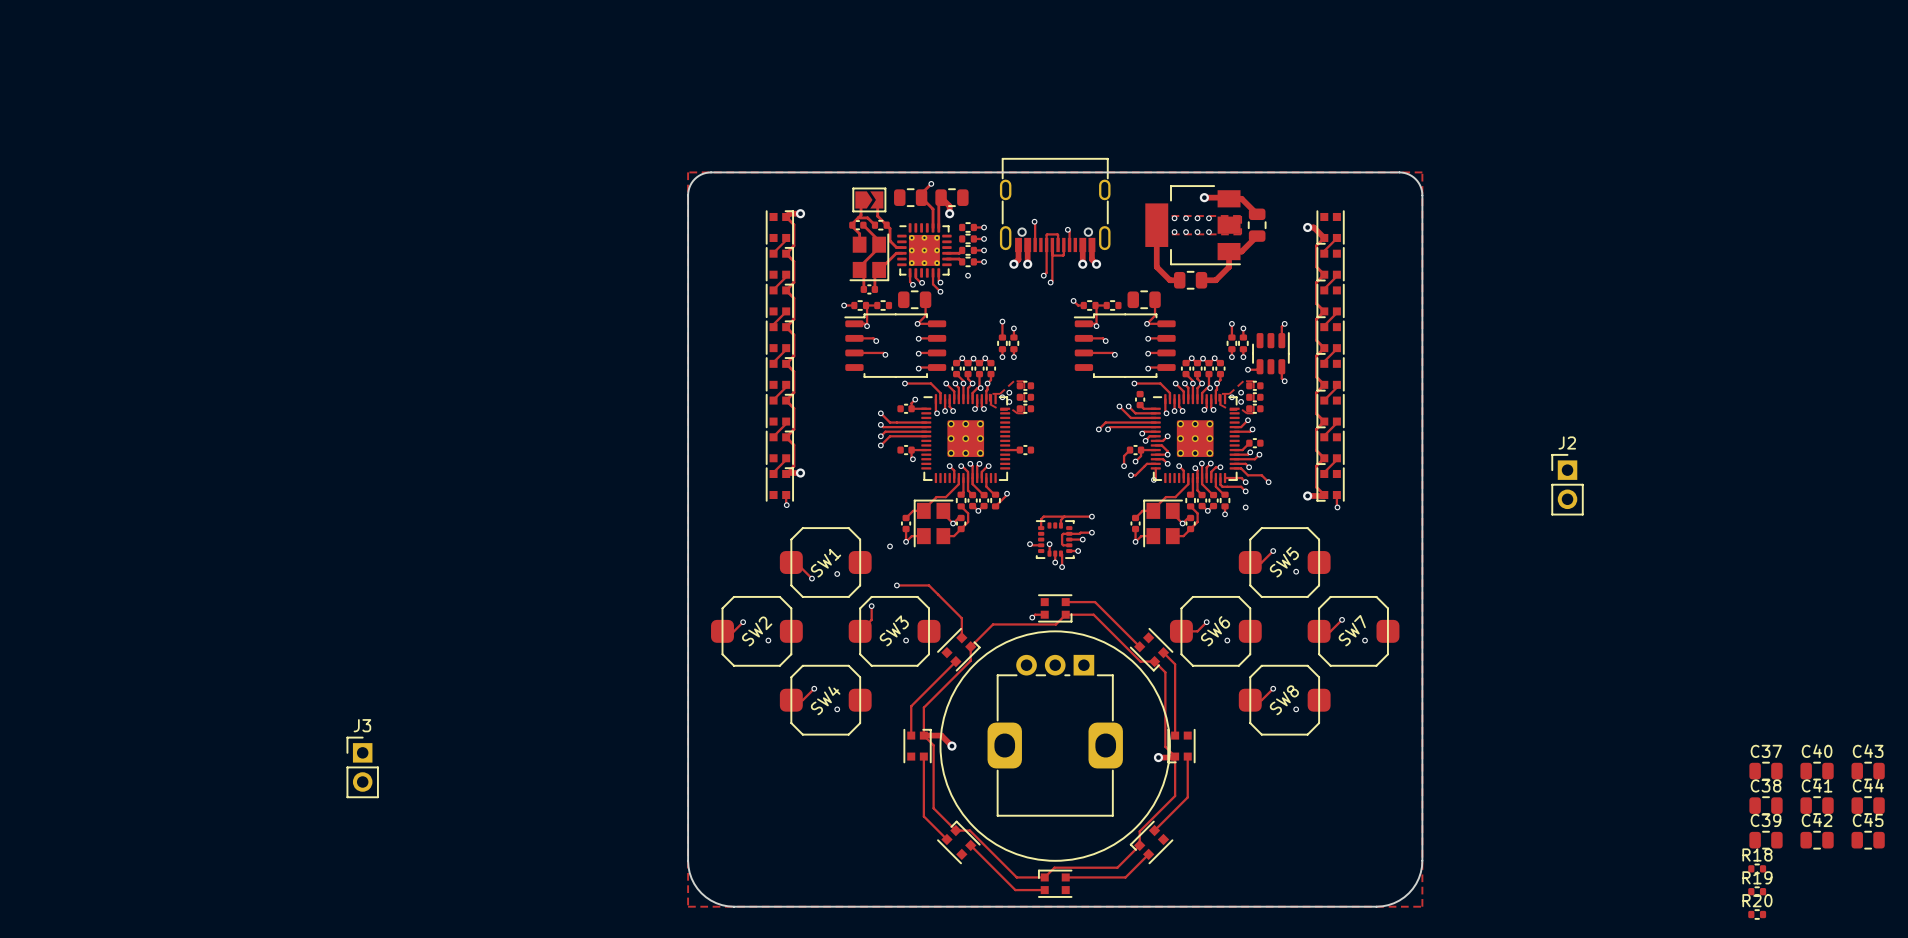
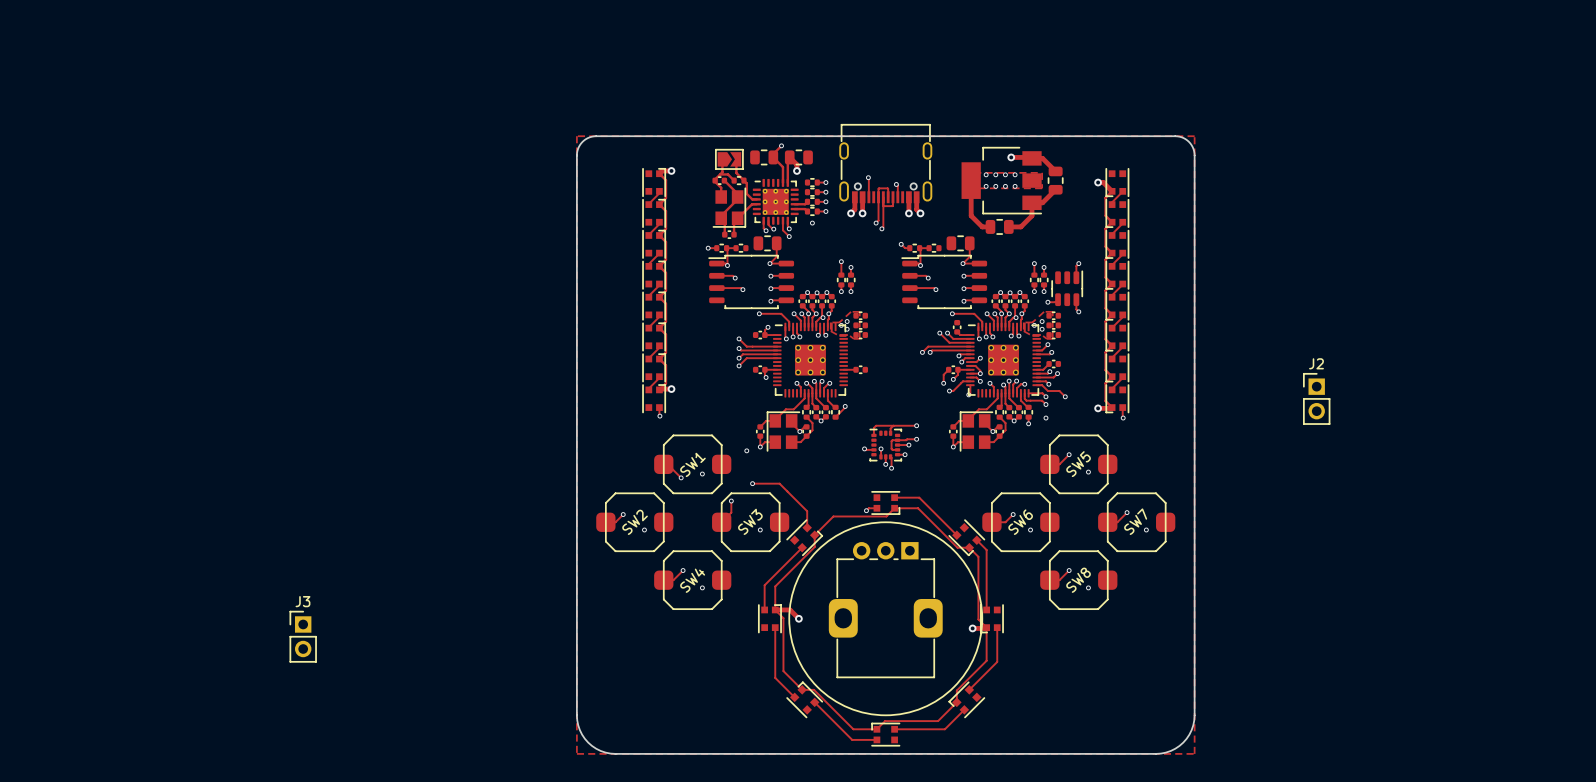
C37: (1766, 771) -> none
C40: (1817, 771) -> none
C43: (1868, 771) -> none
C38: (1766, 805) -> none
C41: (1817, 805) -> none
C44: (1868, 805) -> none
C39: (1766, 840) -> none
C42: (1817, 840) -> none
C45: (1868, 840) -> none
R18: (1757, 868) -> none
R19: (1757, 891) -> none
R20: (1757, 914) -> none

